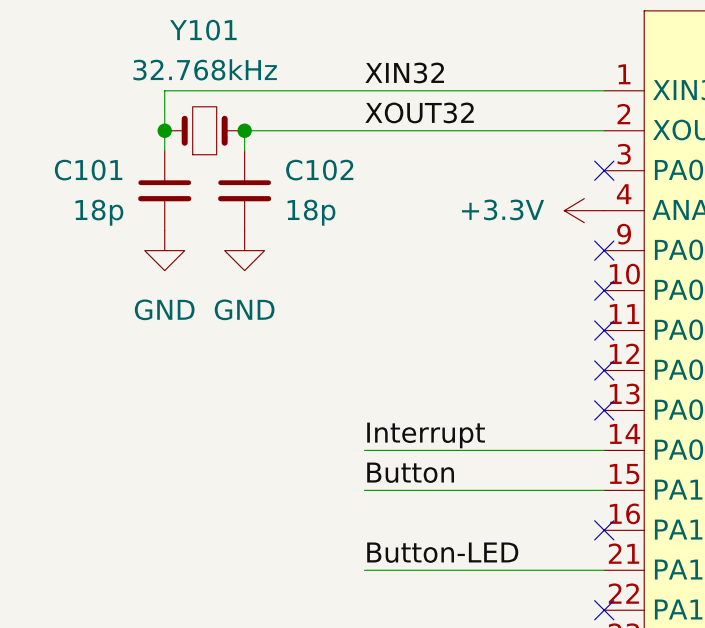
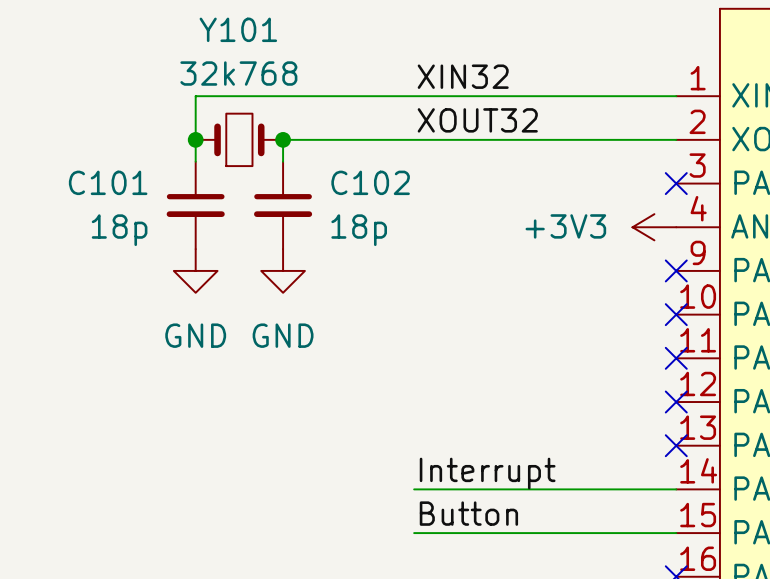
Y101 value: 32.768kHz (205, 69) -> 32k768 (238, 73)
power symbol: +3.3V (584, 210) -> +3V3 (654, 227)

